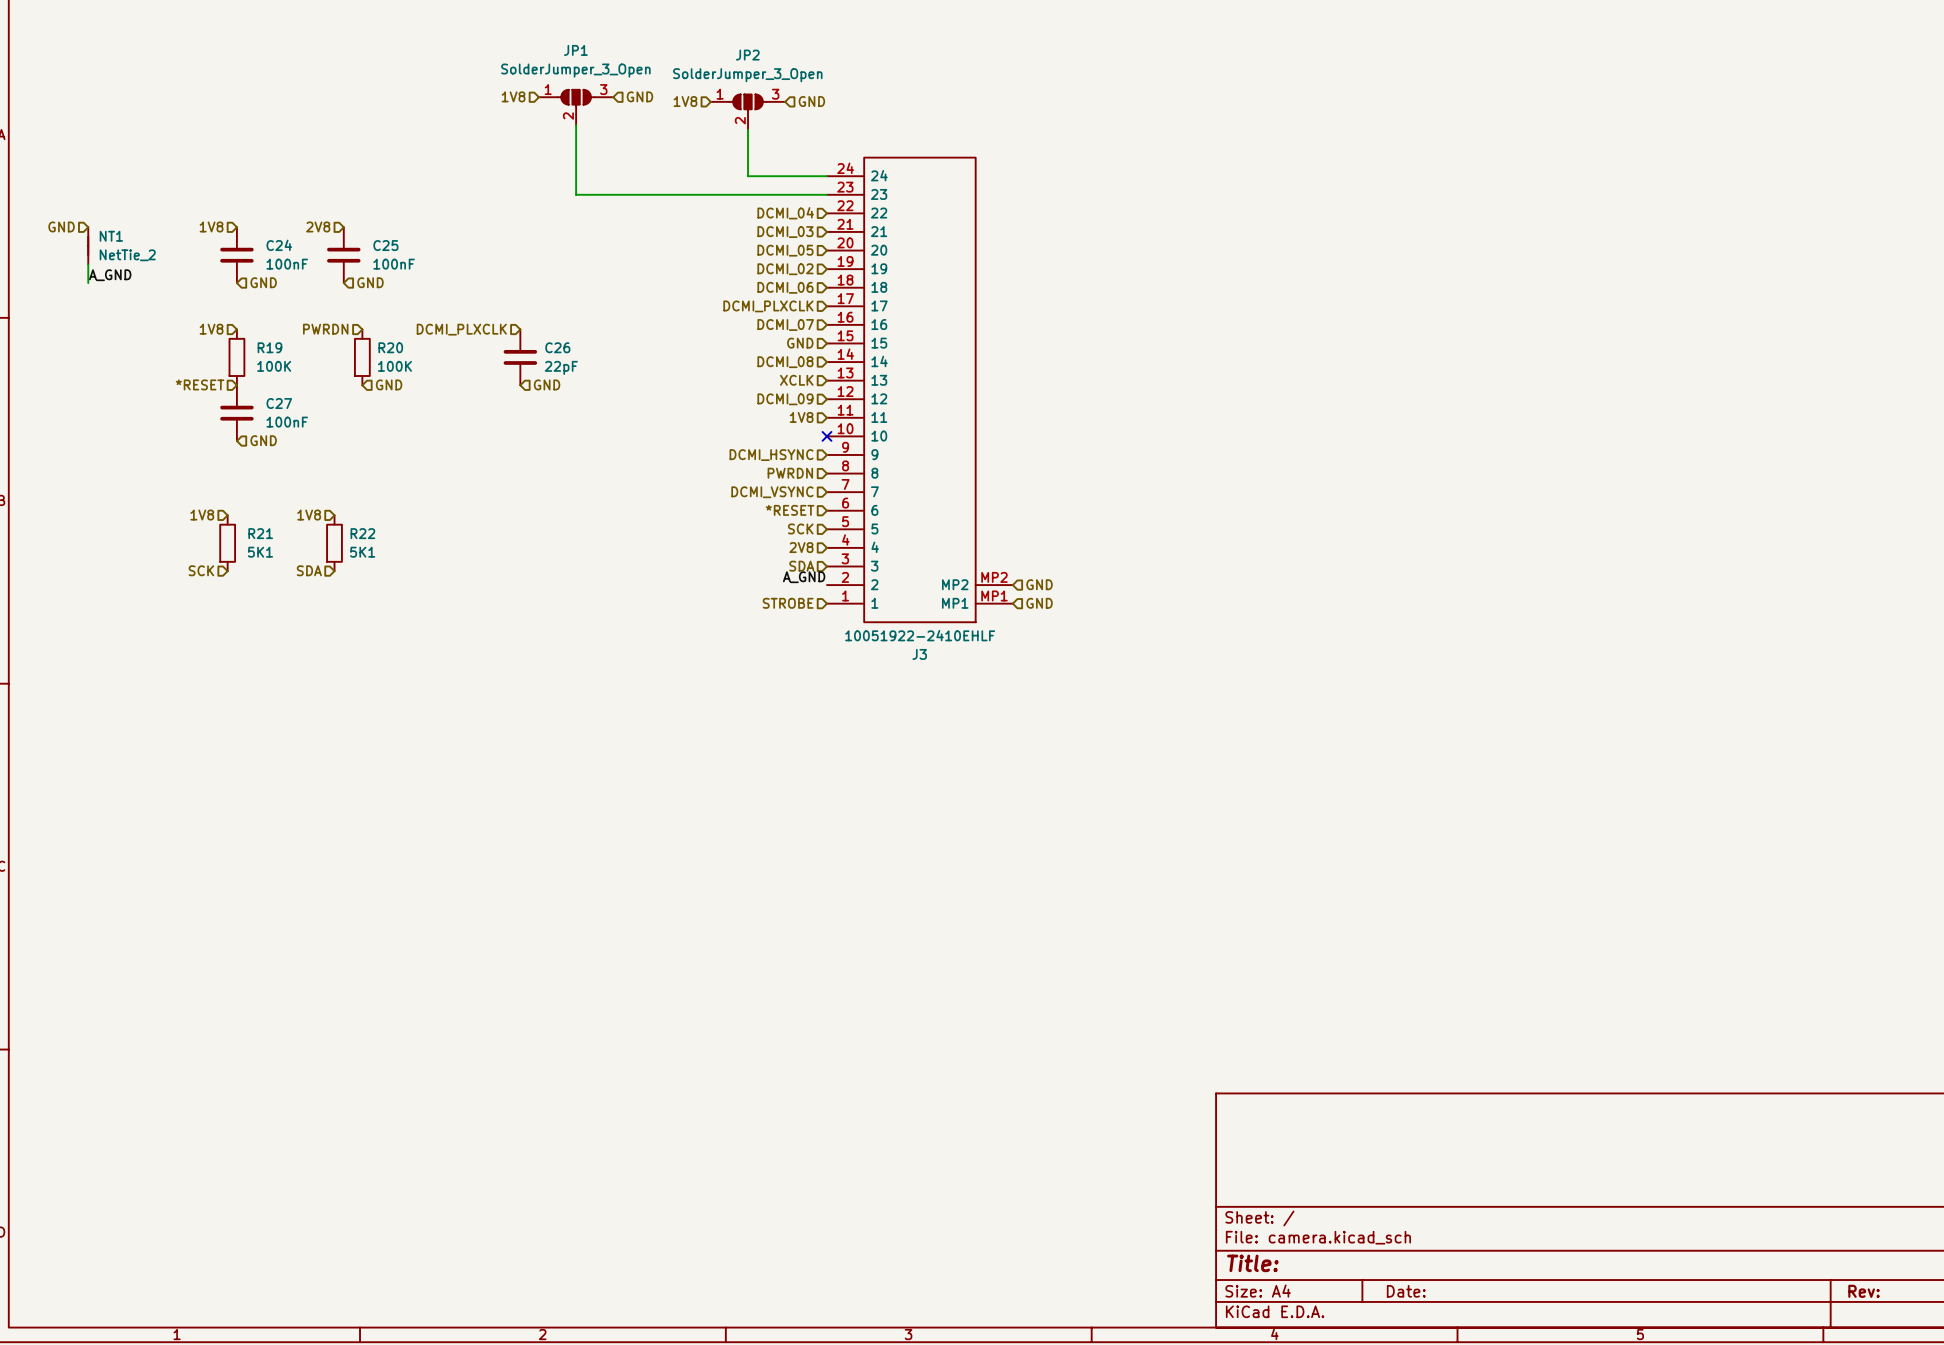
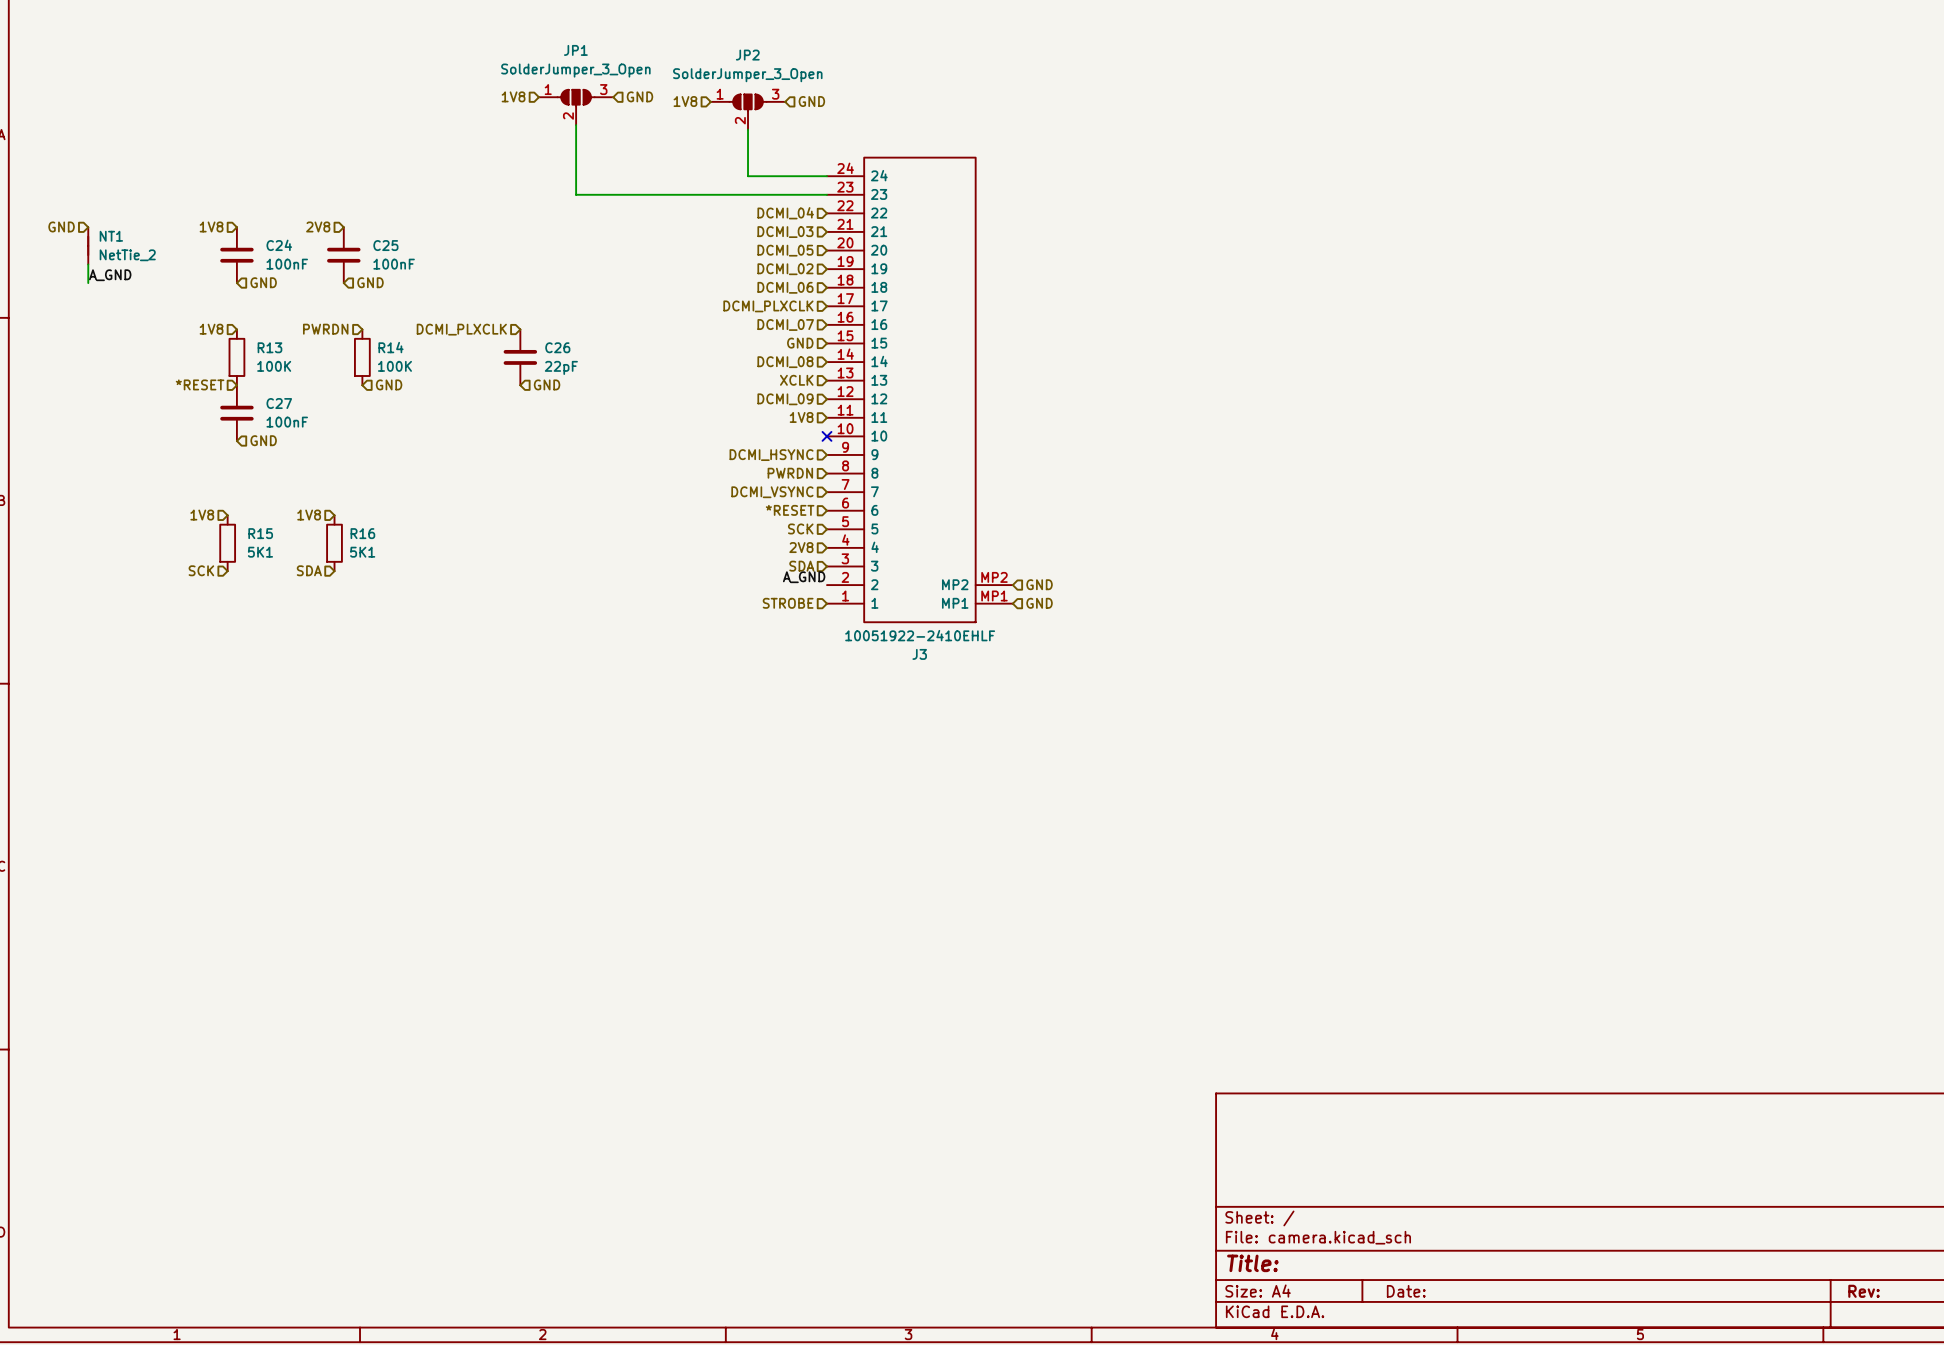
R19 name: R19 (269, 347) -> R13 (269, 347)
R20 name: R20 (390, 347) -> R14 (390, 347)
R21 name: R21 (260, 533) -> R15 (260, 533)
R22 name: R22 (362, 533) -> R16 (362, 533)

